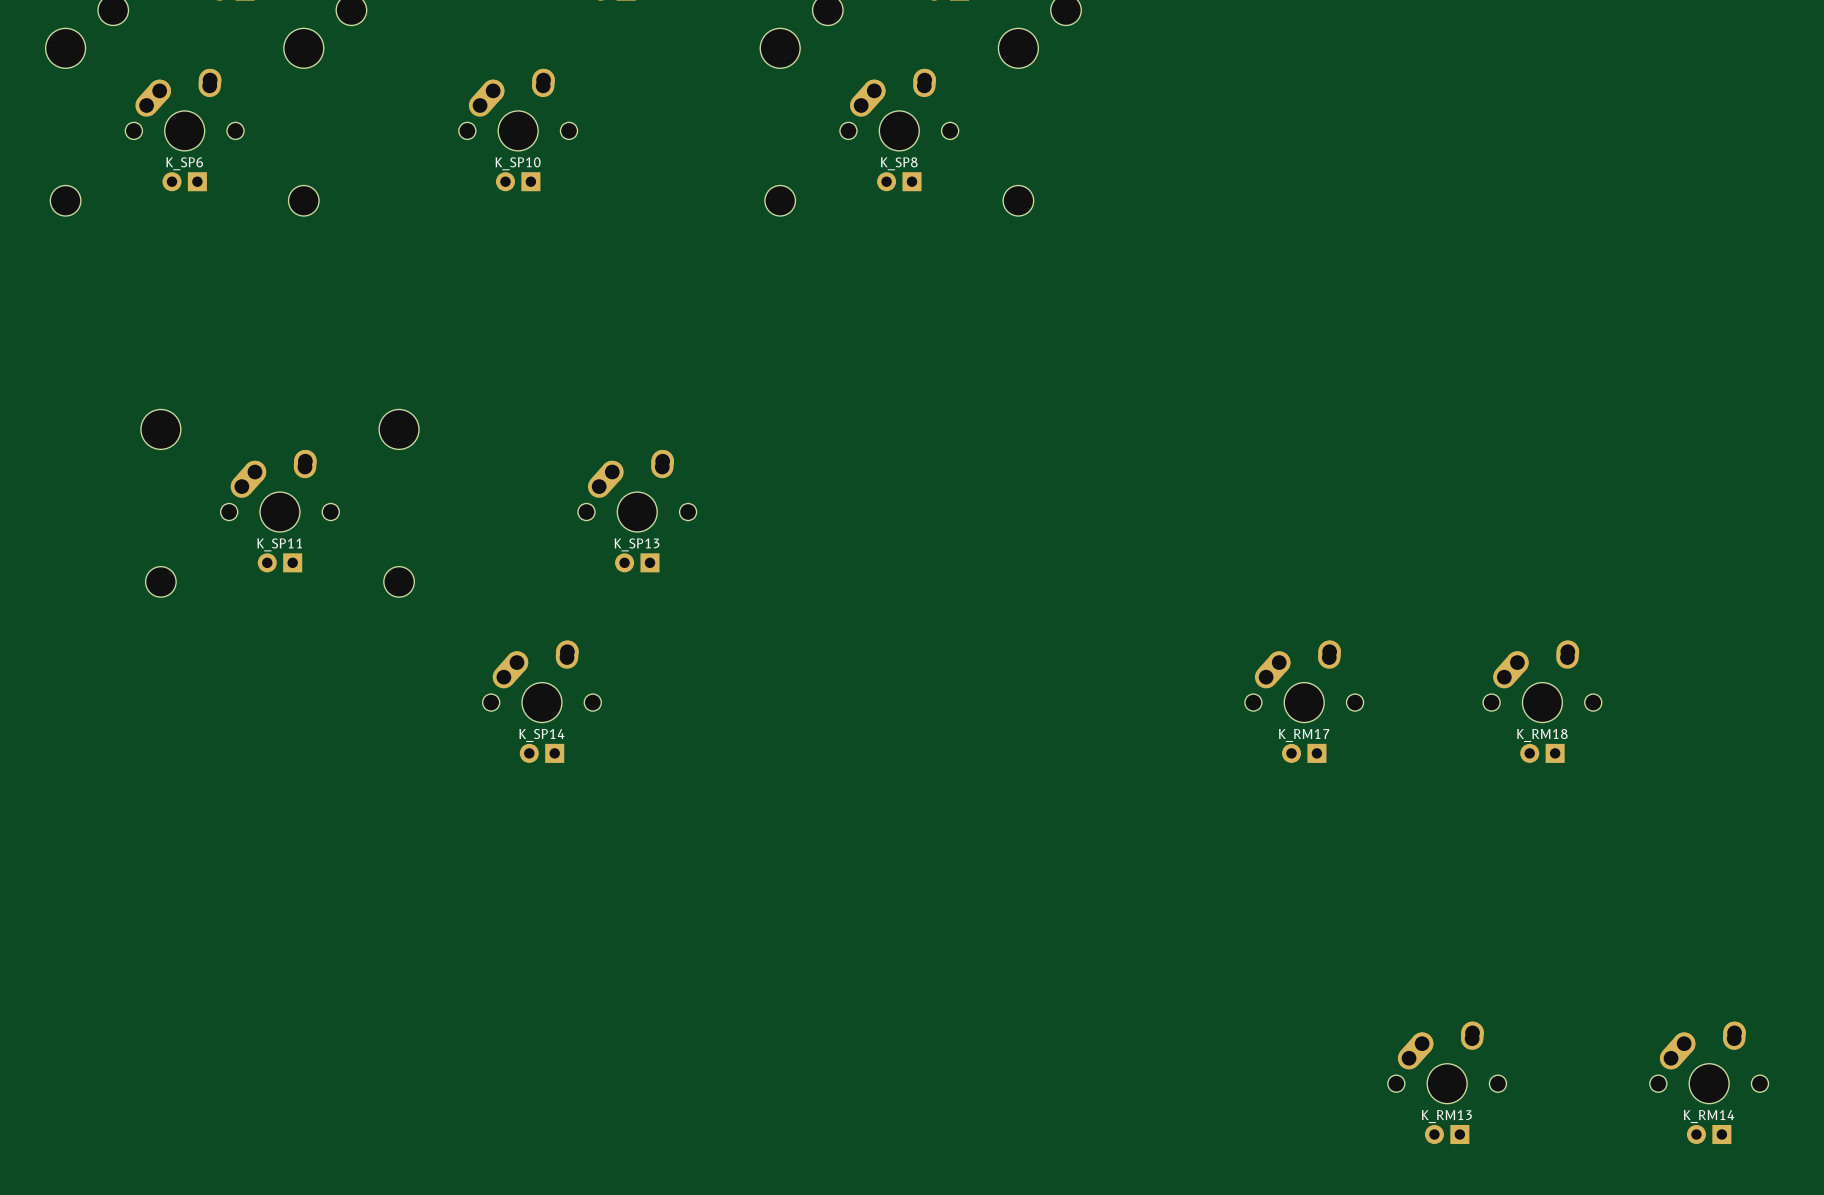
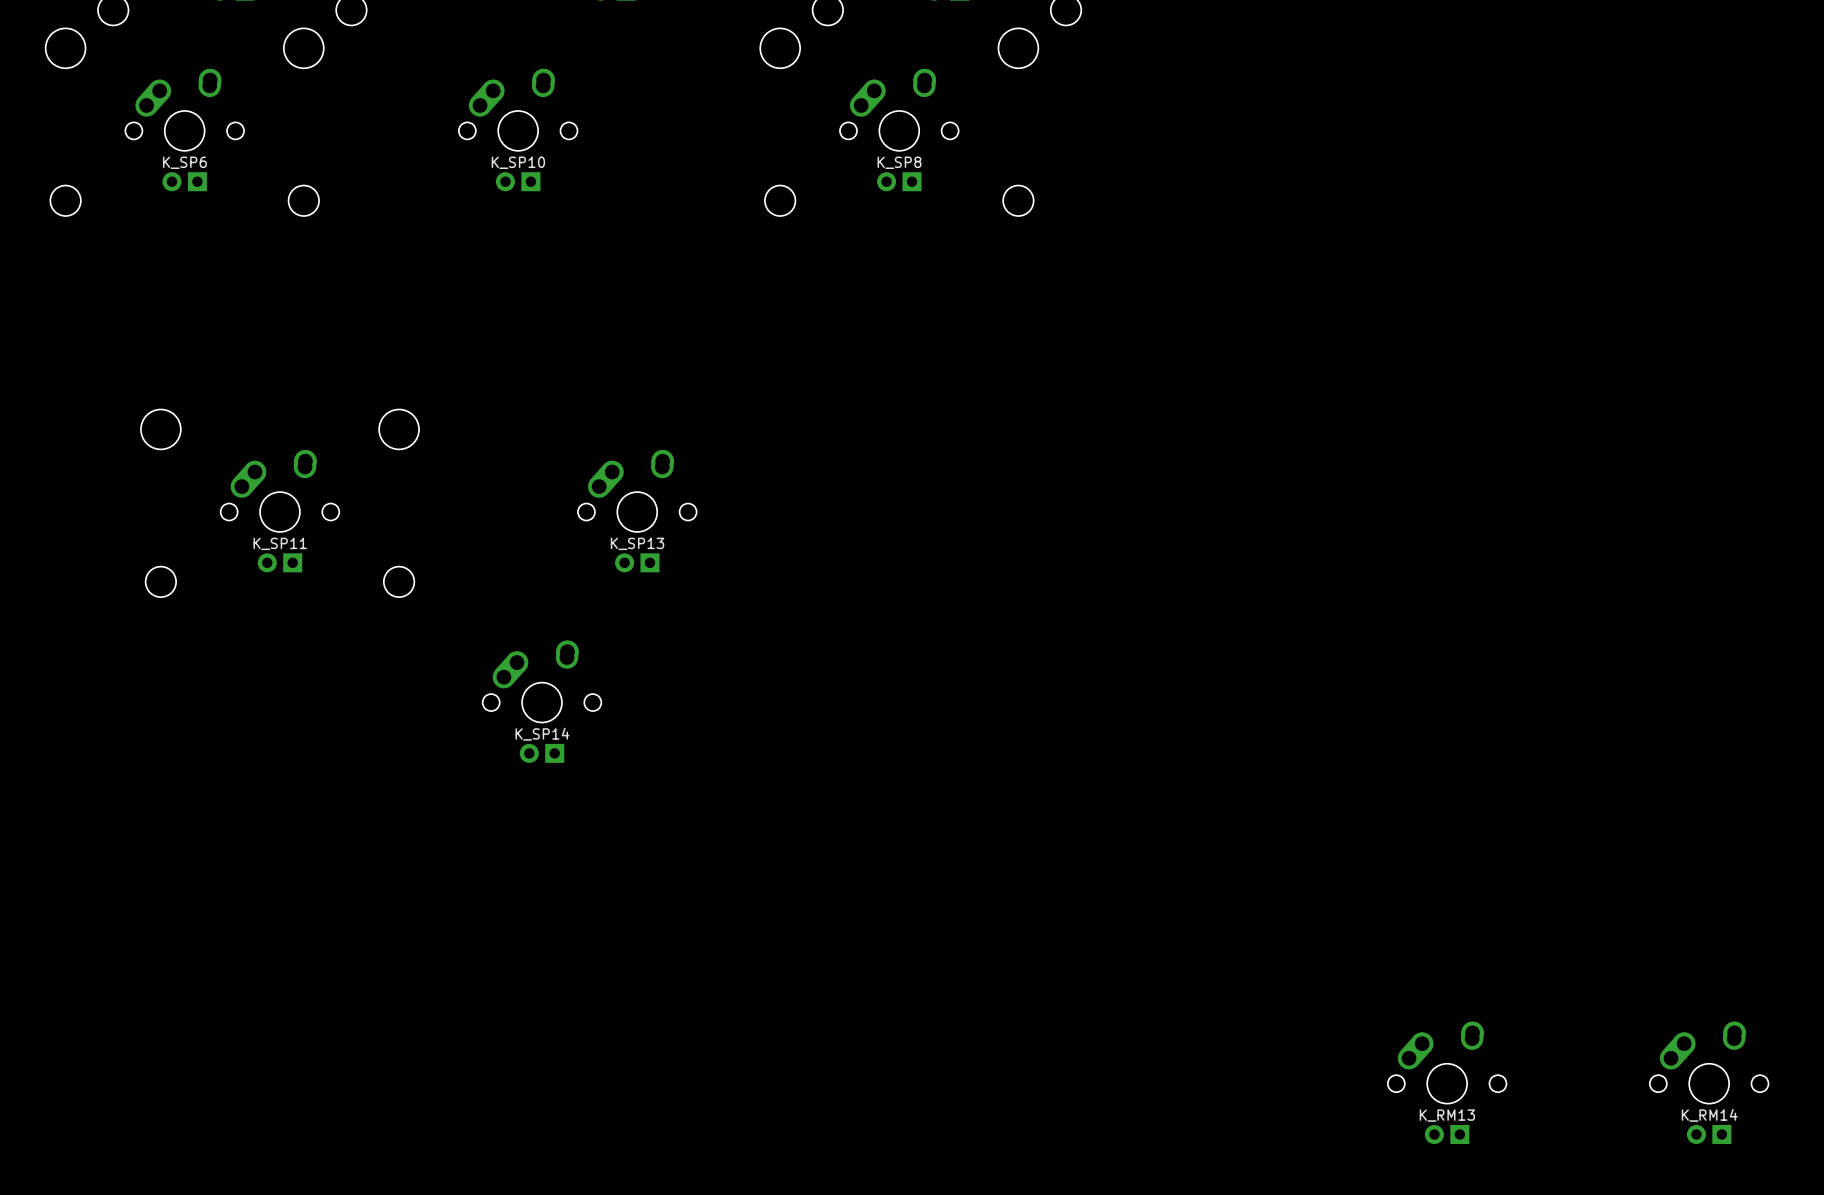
K_RM17: (1304, 701) -> none
K_RM18: (1542, 701) -> none

